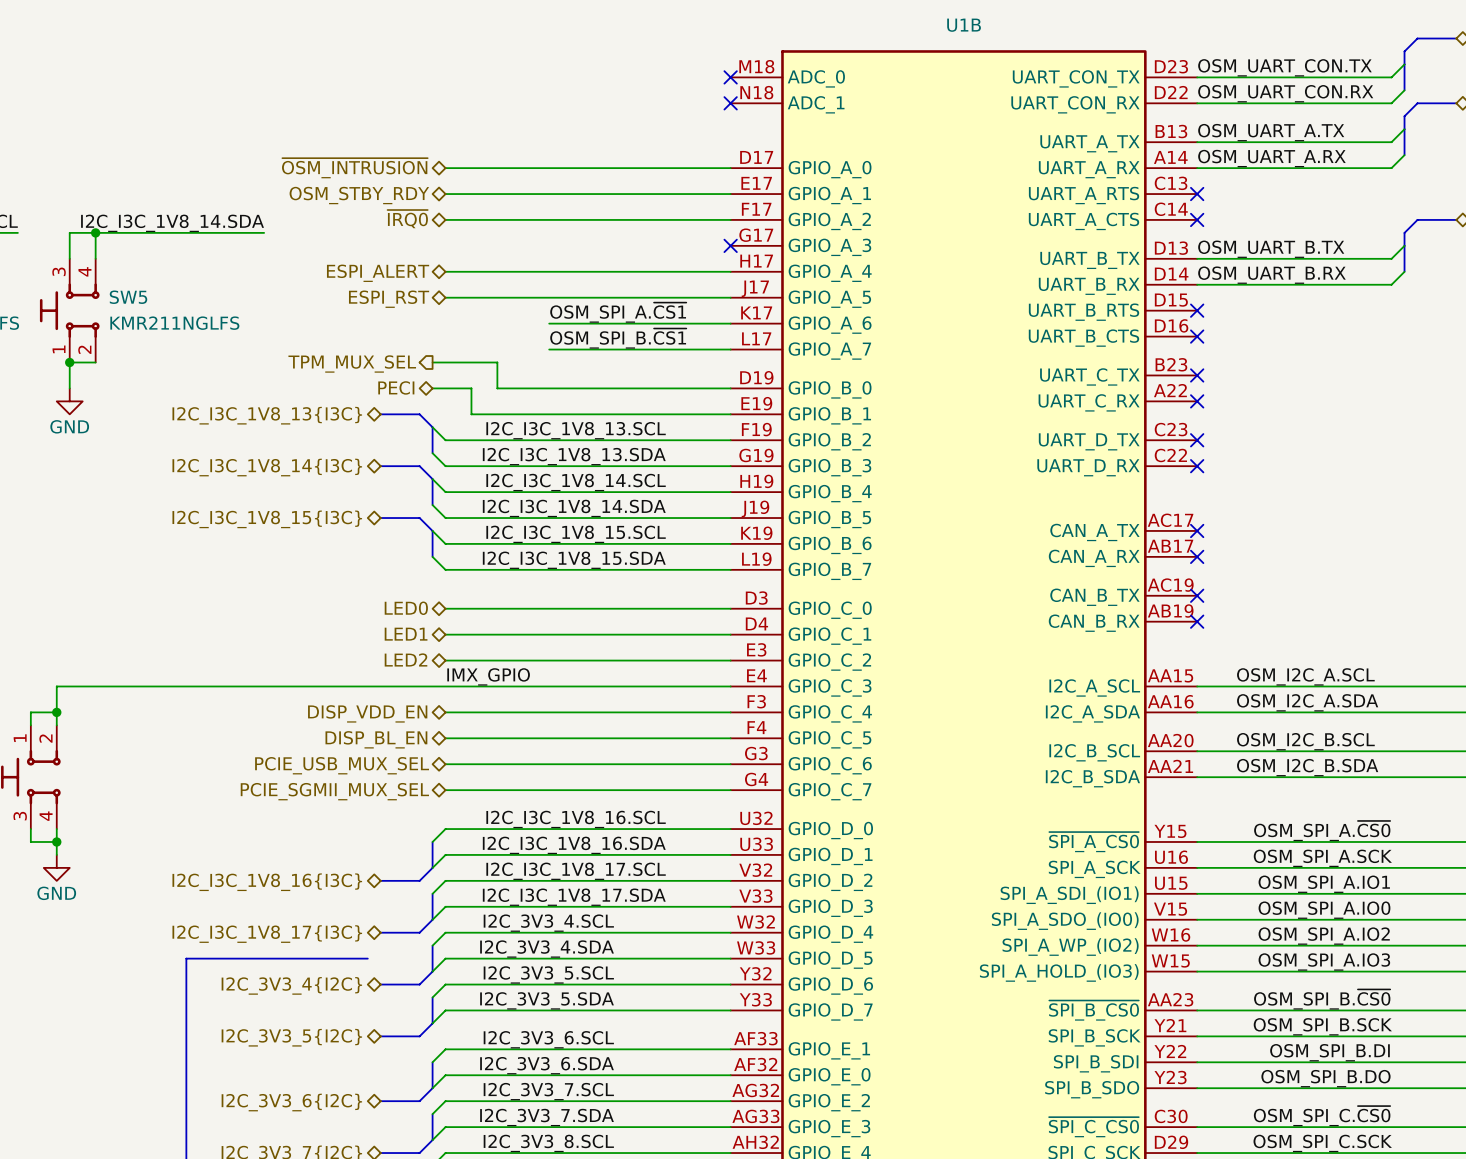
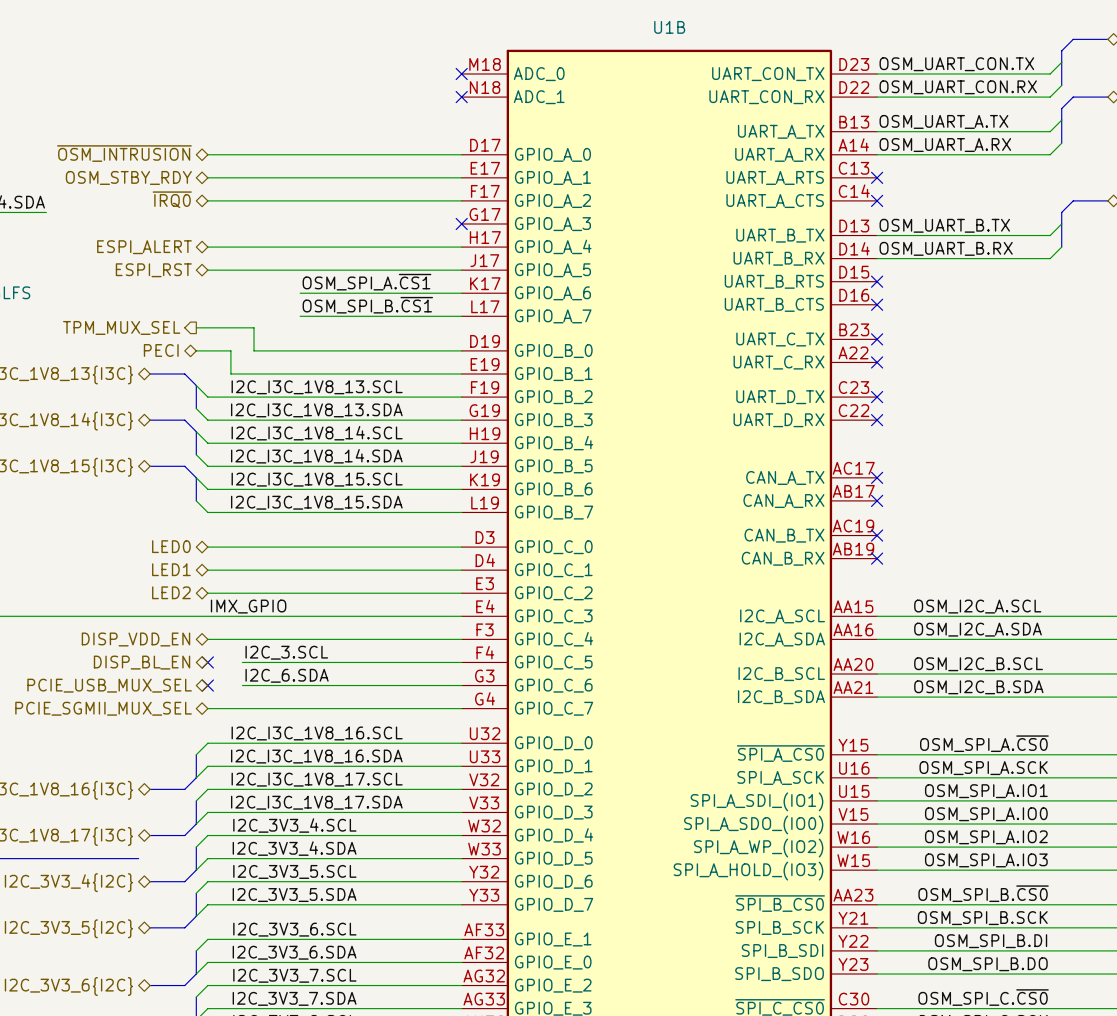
label: none -> I2C_3.SCL (286, 652)
wire: (445, 738) (484, 738) -> none
no-connect mark: none -> (207, 662)
label: none -> I2C_6.SDA (287, 675)
wire: (445, 764) (484, 764) -> none
no-connect mark: none -> (207, 685)

